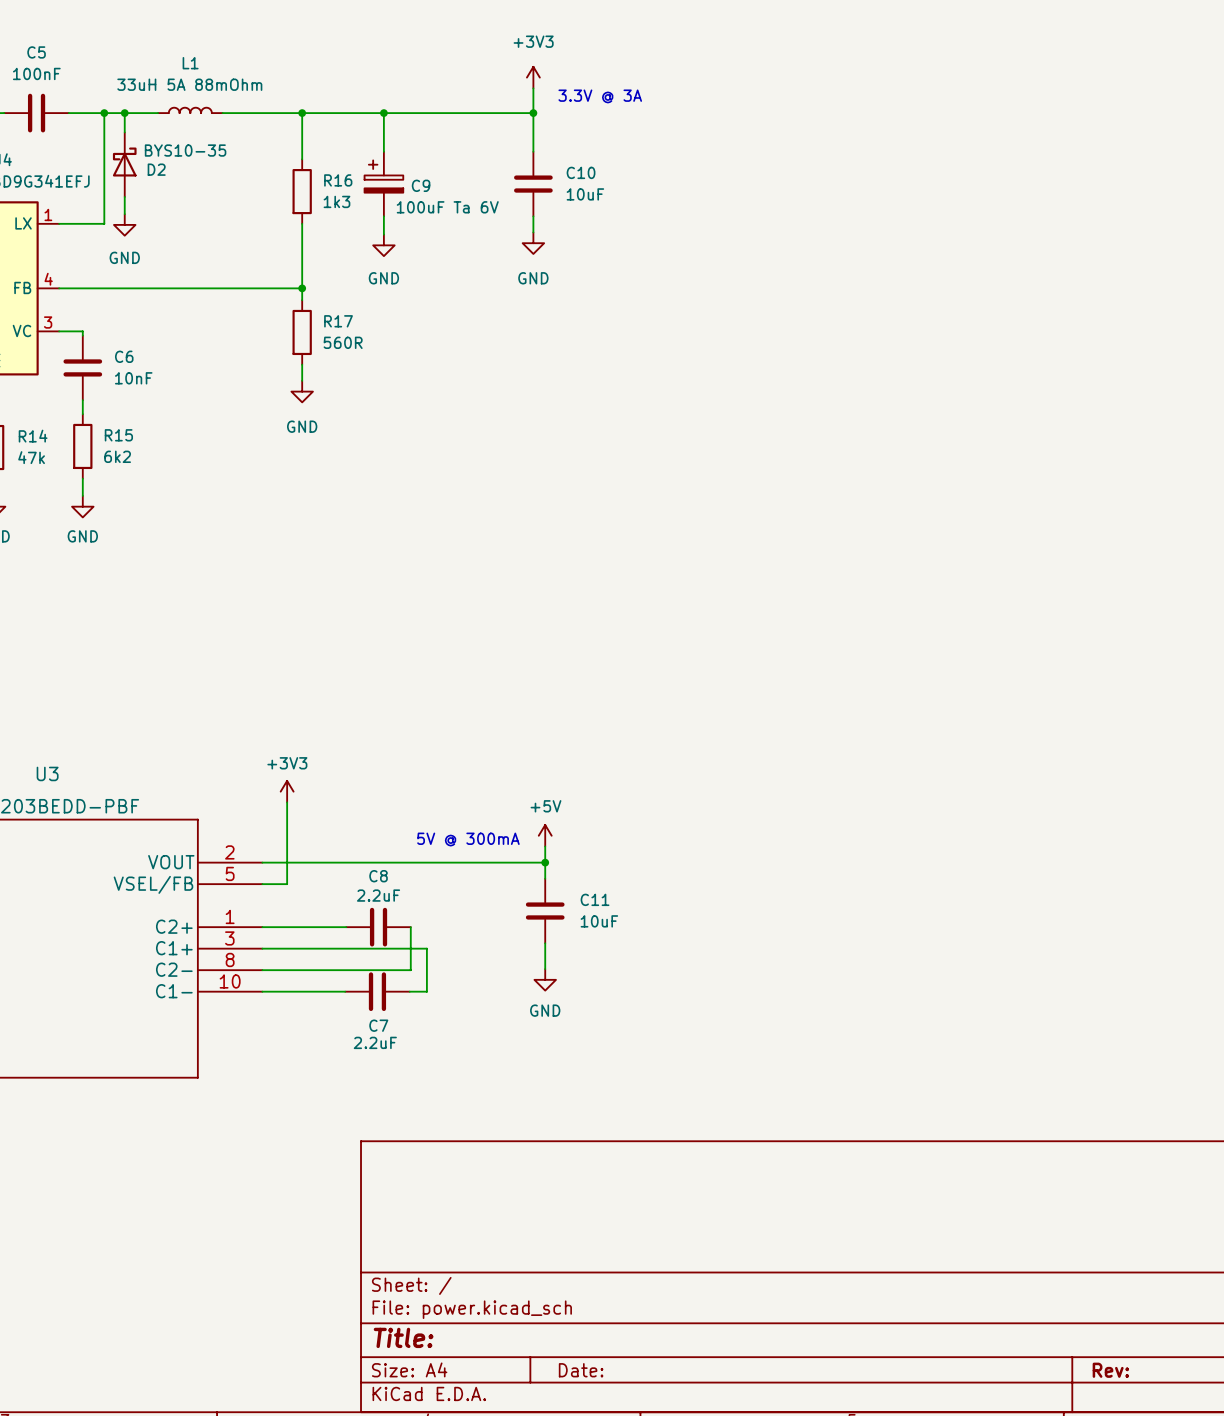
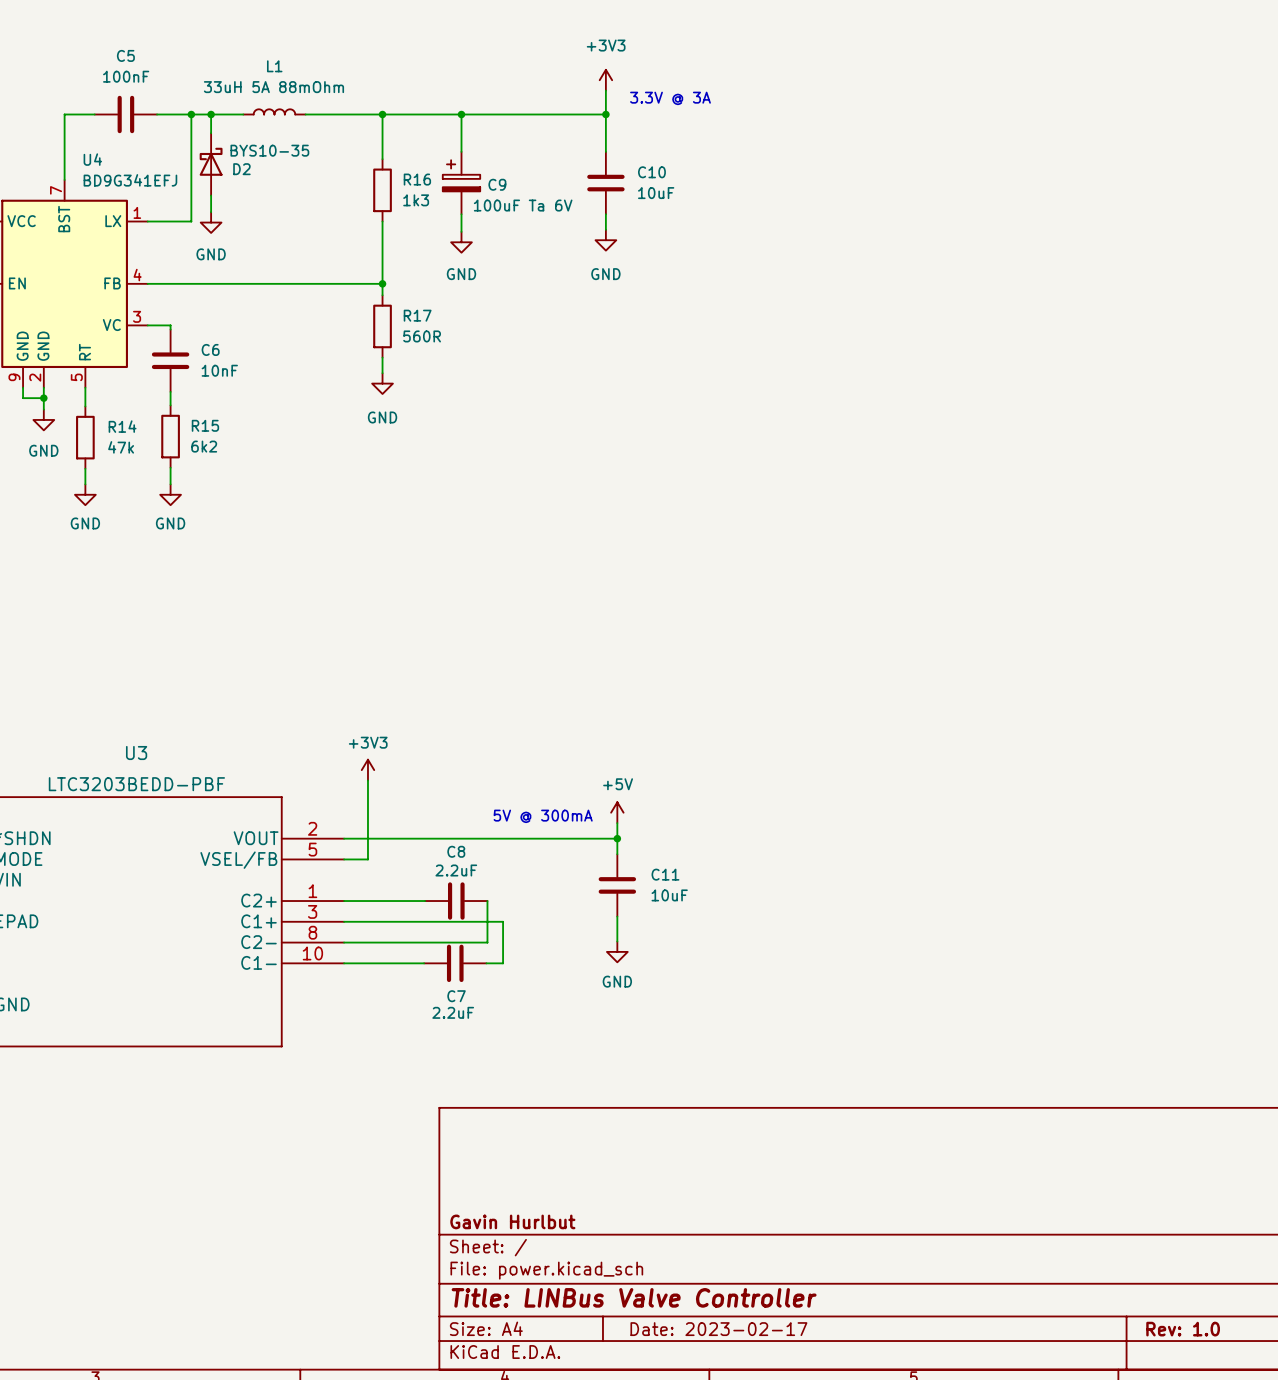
title block: none -> Gavin Hurlbut (512, 1221)
title block: Title: (403, 1337) -> Title: LINBus Valve Controller (634, 1297)
title block: Date: (581, 1370) -> Date: 2023-02-17 (718, 1329)
title block: Rev: (1110, 1370) -> Rev: 1.0 (1183, 1329)

